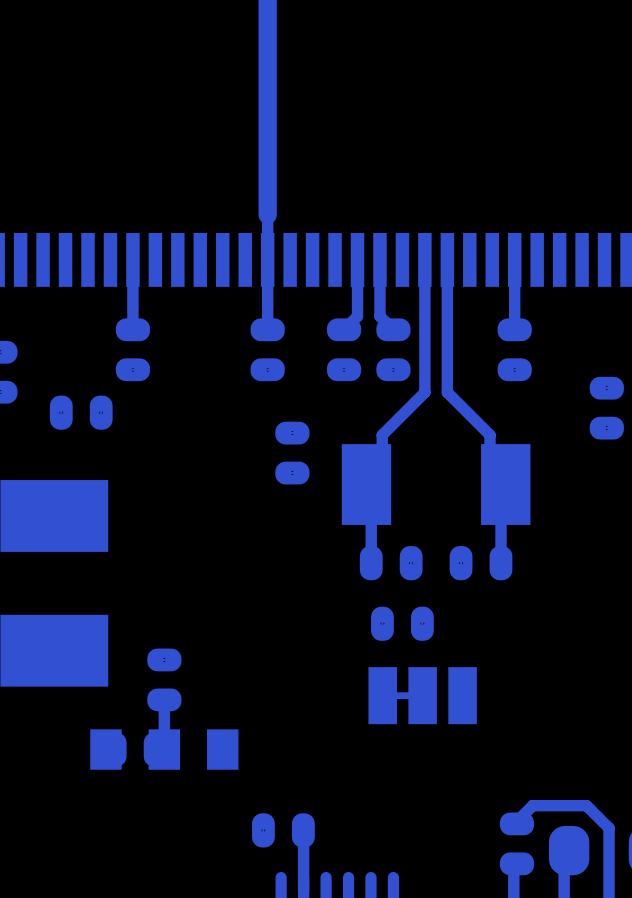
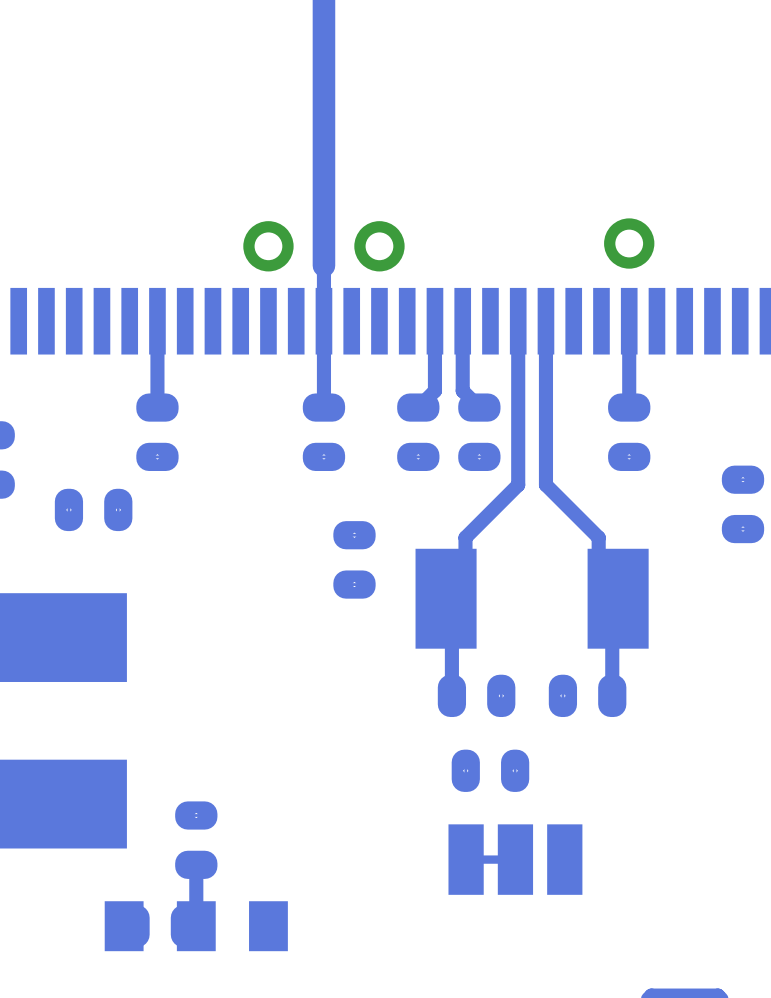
via: none -> (629, 243)
via: none -> (268, 246)
via: none -> (379, 246)

